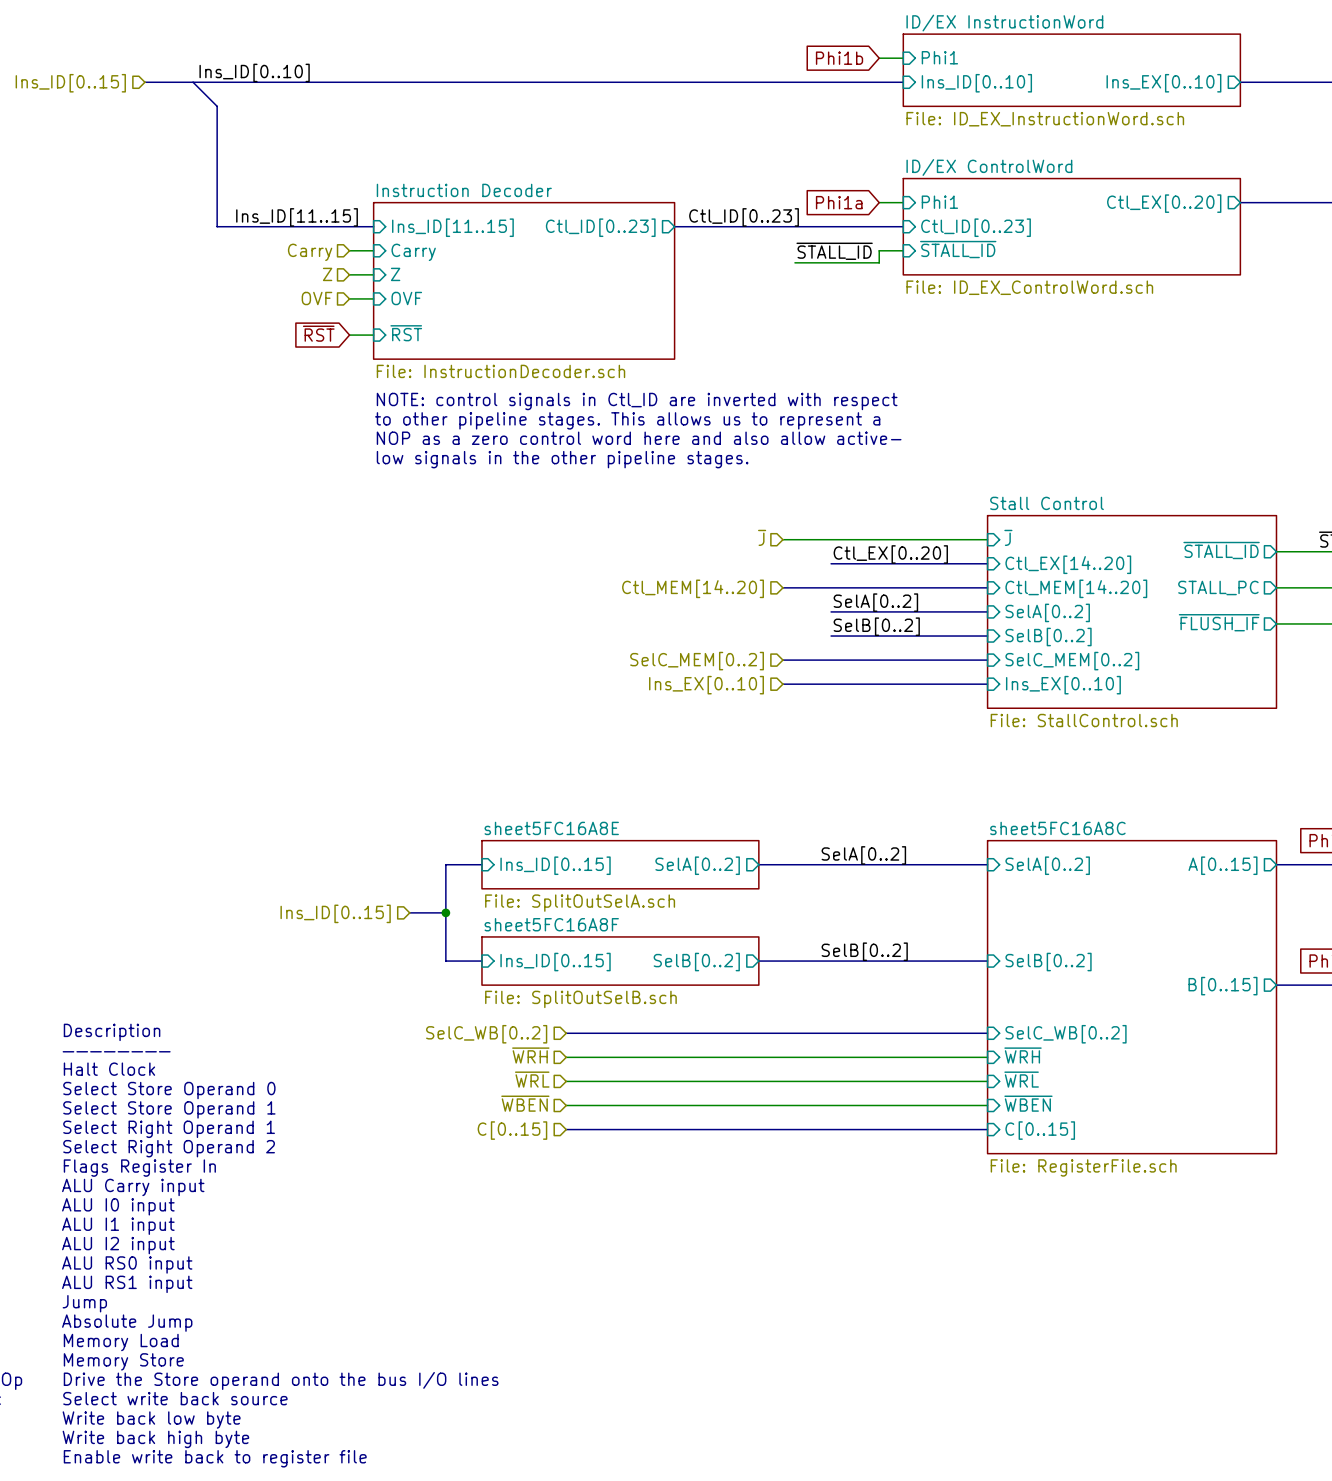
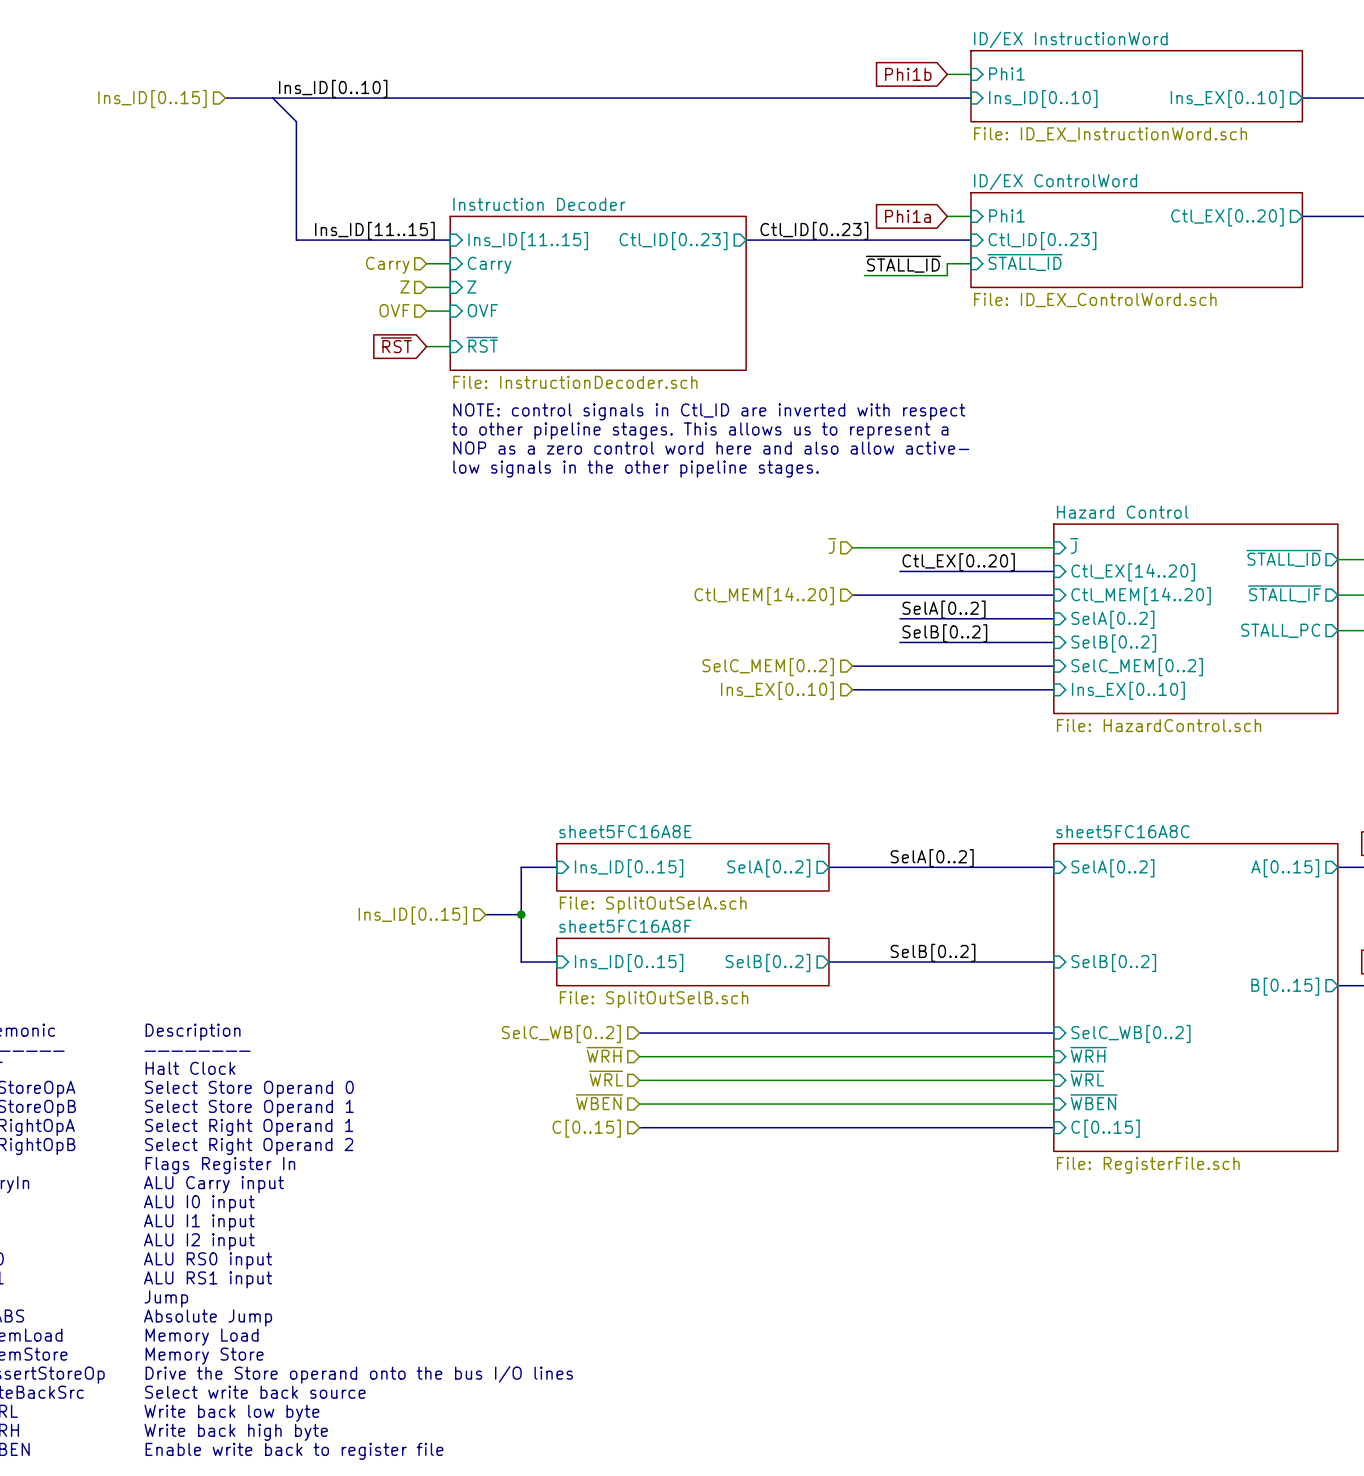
sheet Stall Control name: Stall Control (1046, 503) -> Hazard Control (1122, 512)
sheet pin: STALL_PC (1218, 587) -> ~{STALL_IF} (1284, 593)
sheet pin: ~{FLUSH_IF} (1219, 622) -> STALL_PC (1280, 630)
sheet Stall Control value: File: StallControl.sch (1084, 720) -> File: HazardControl.sch (1159, 725)

